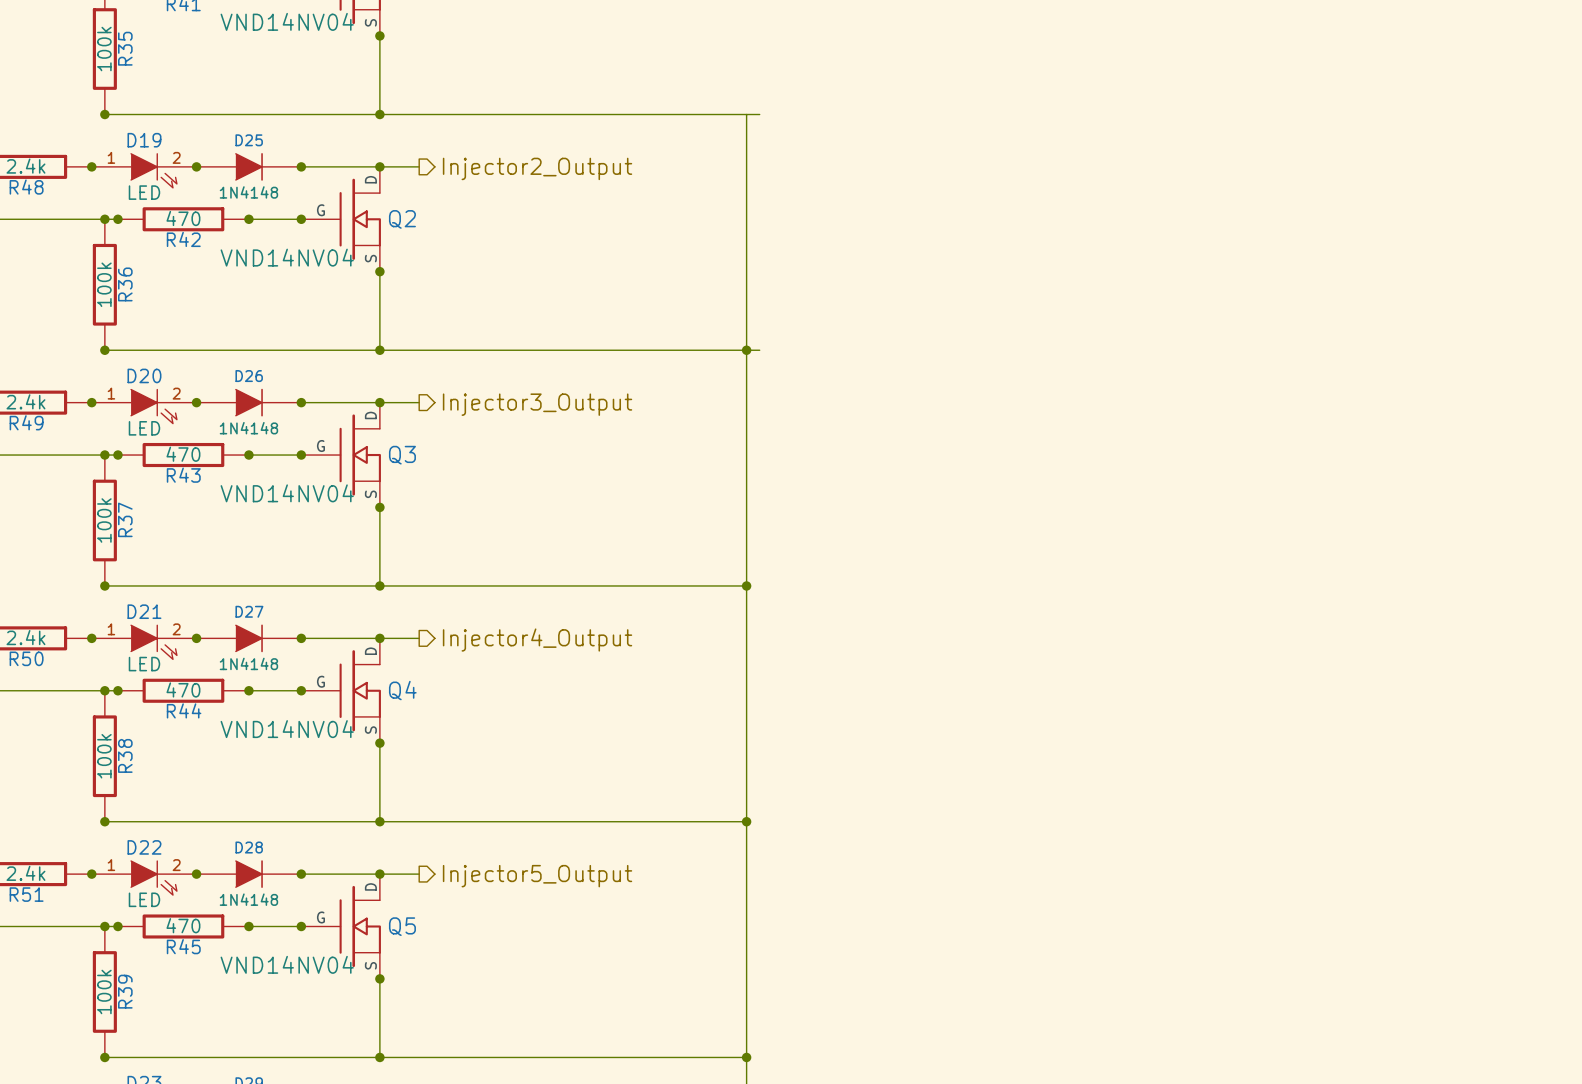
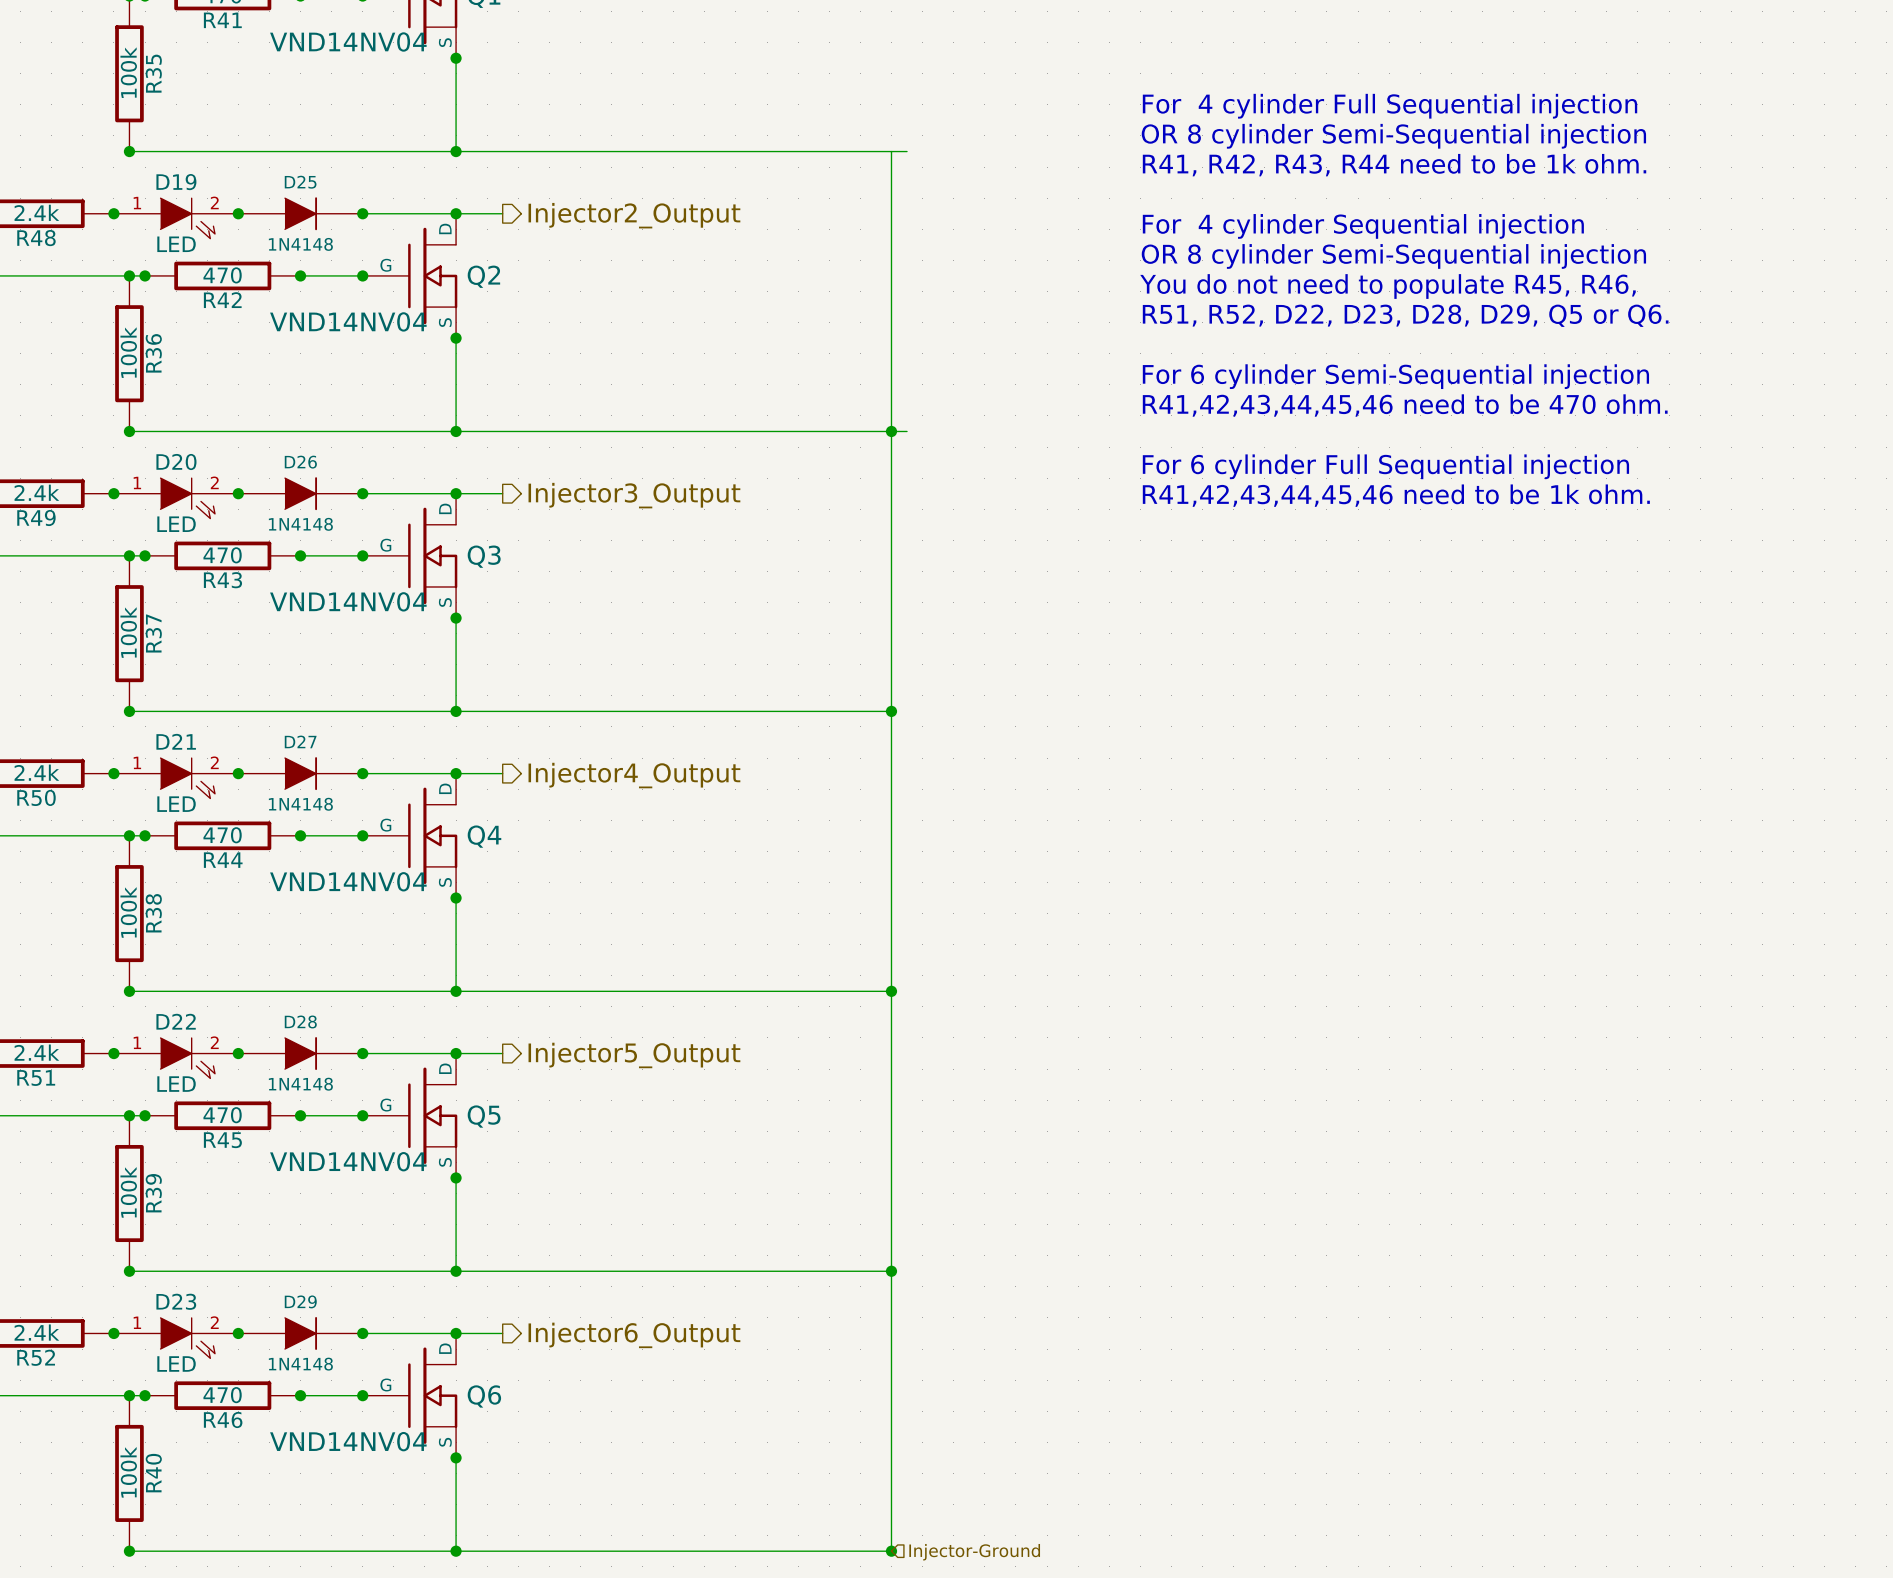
text: none -> For 4 cylinder Full Sequential injection (1390, 106)
text: none -> OR 8 cylinder Semi-Sequential injection (1393, 136)
text: none -> R41, R42, R43, R44 need to be 1k ohm. (1394, 165)
text: none -> For 4 cylinder Sequential injection (1363, 226)
text: none -> OR 8 cylinder Semi-Sequential injection (1393, 256)
text: none -> You do not need to populate R45, R46, (1388, 286)
text: none -> R51, R52, D22, D23, D28, D29, Q5 or Q6. (1405, 315)
text: none -> For 6 cylinder Semi-Sequential injection (1395, 376)
text: none -> R41,42,43,44,45,46 need to be 470 ohm. (1405, 405)
text: none -> For 6 cylinder Full Sequential injection (1385, 466)
text: none -> R41,42,43,44,45,46 need to be 1k ohm. (1396, 495)

